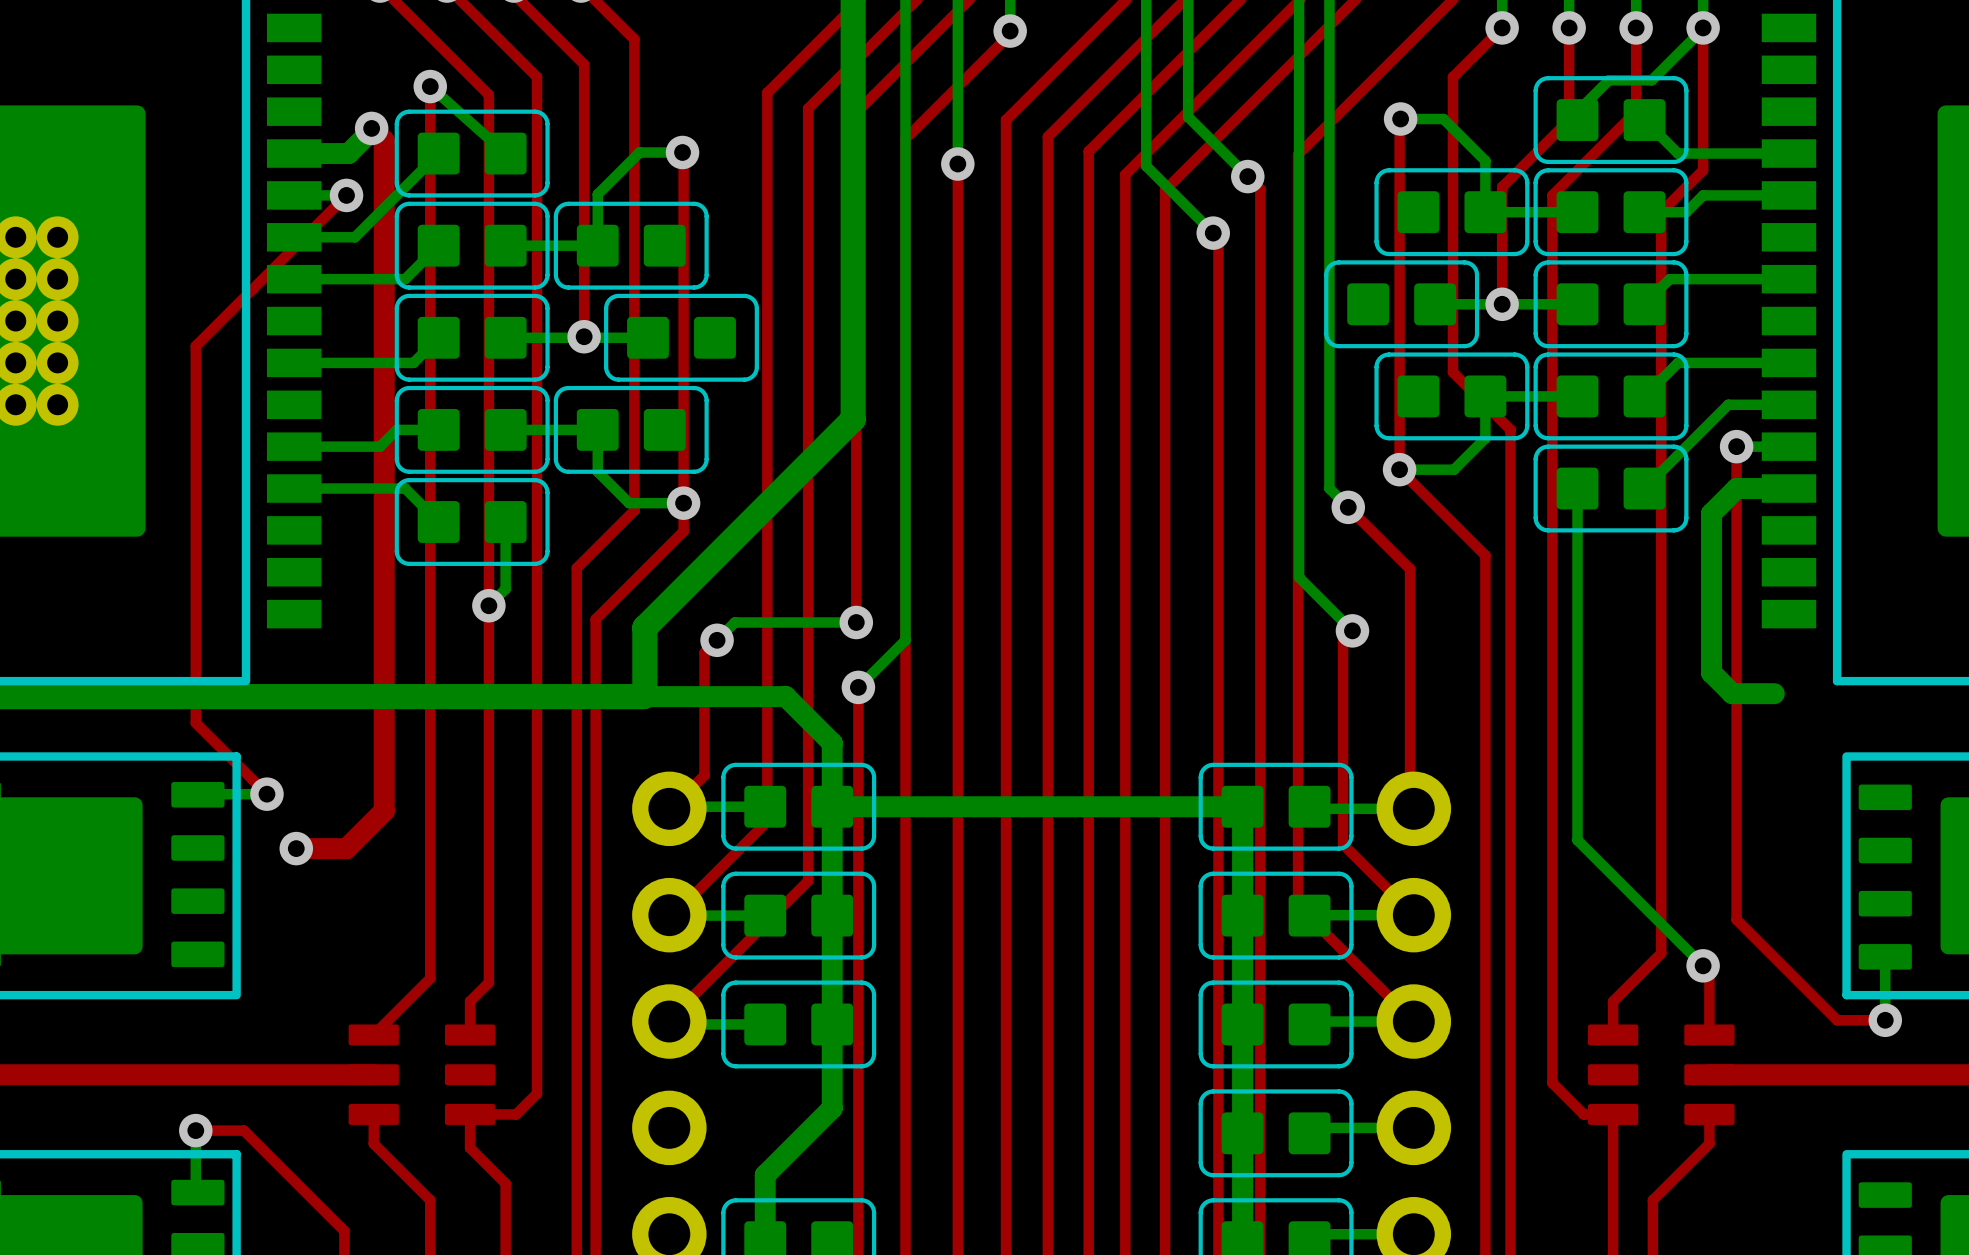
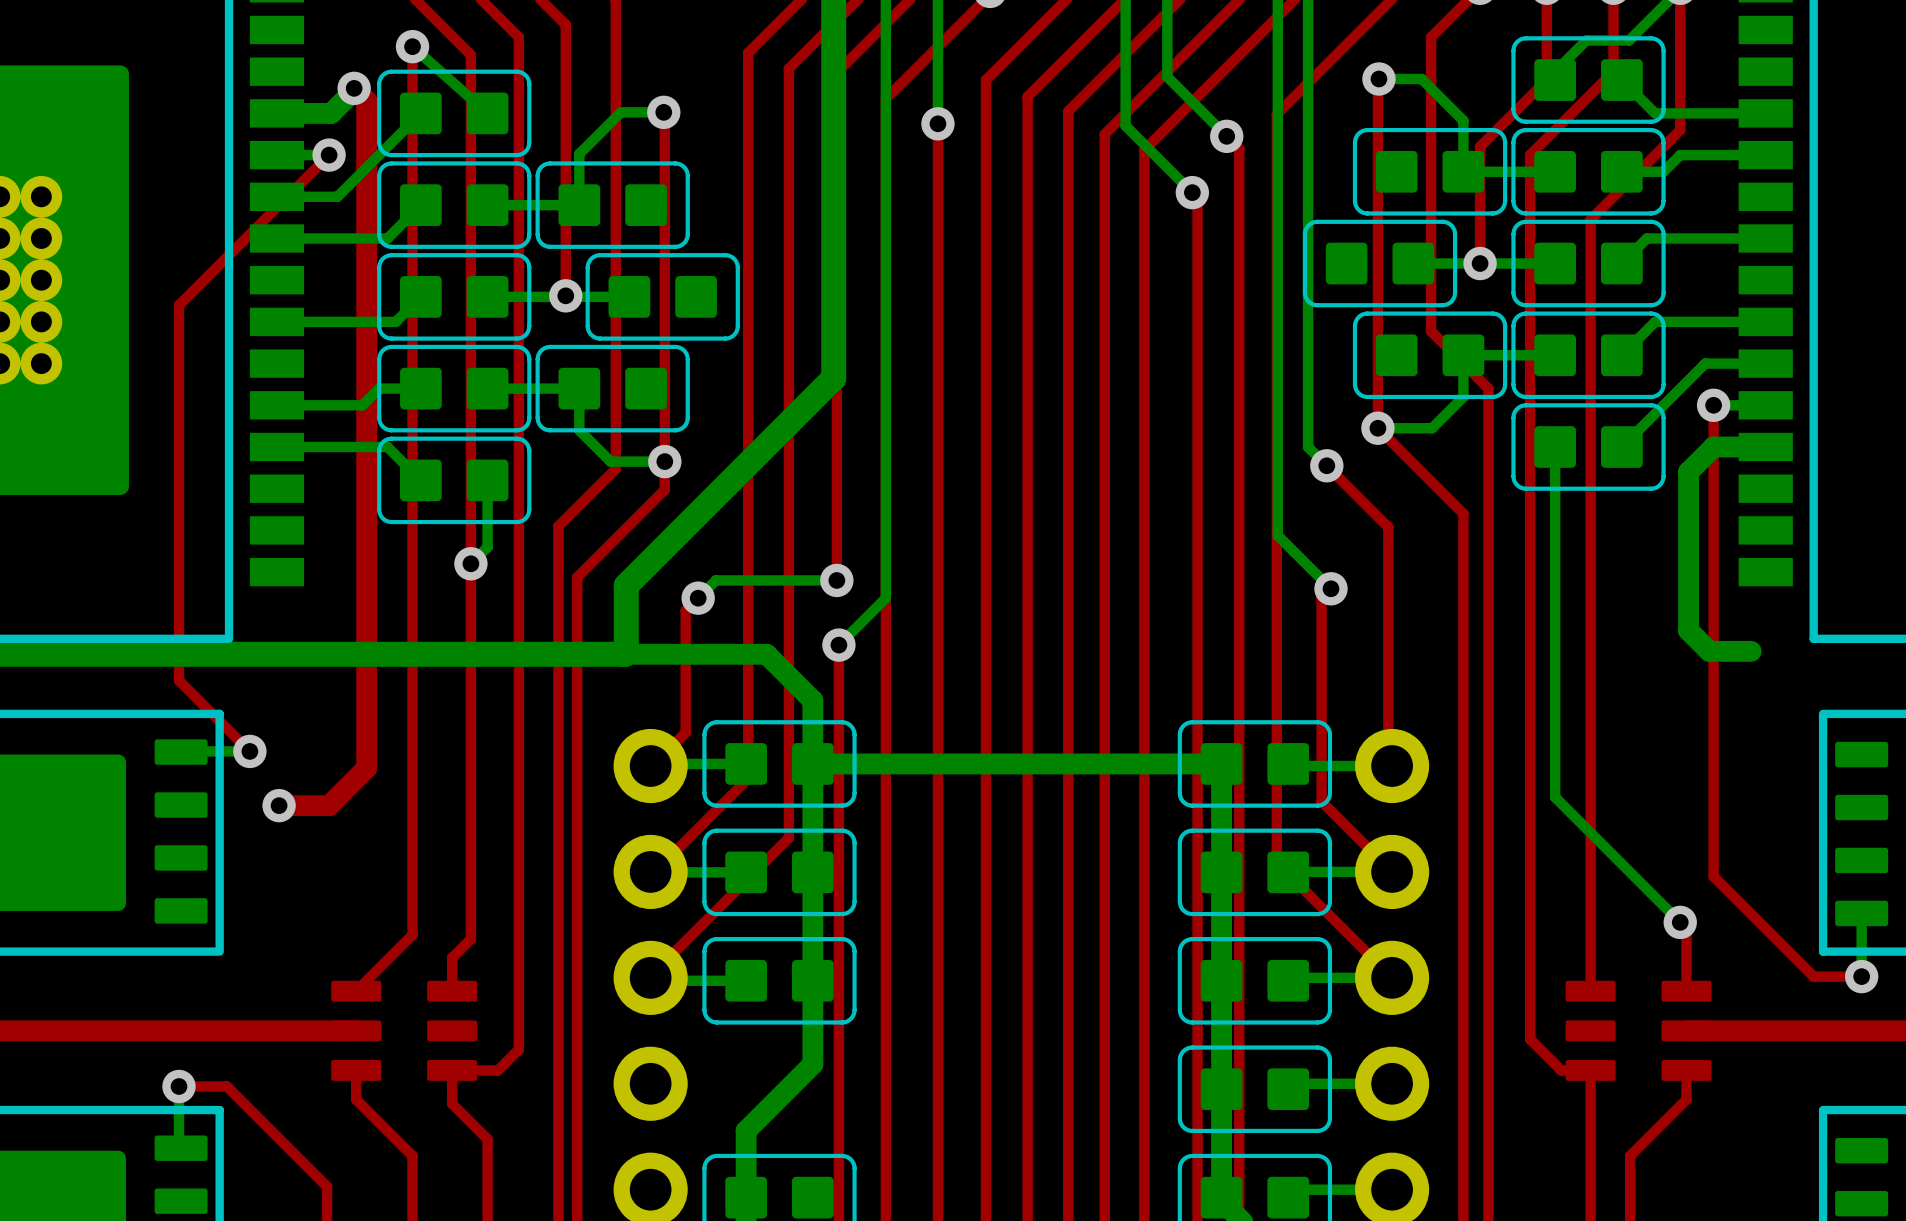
top track: (1661, 212) (1661, 953) (1613, 1001) -> (1638, 171) (1590, 219) (1590, 957)

